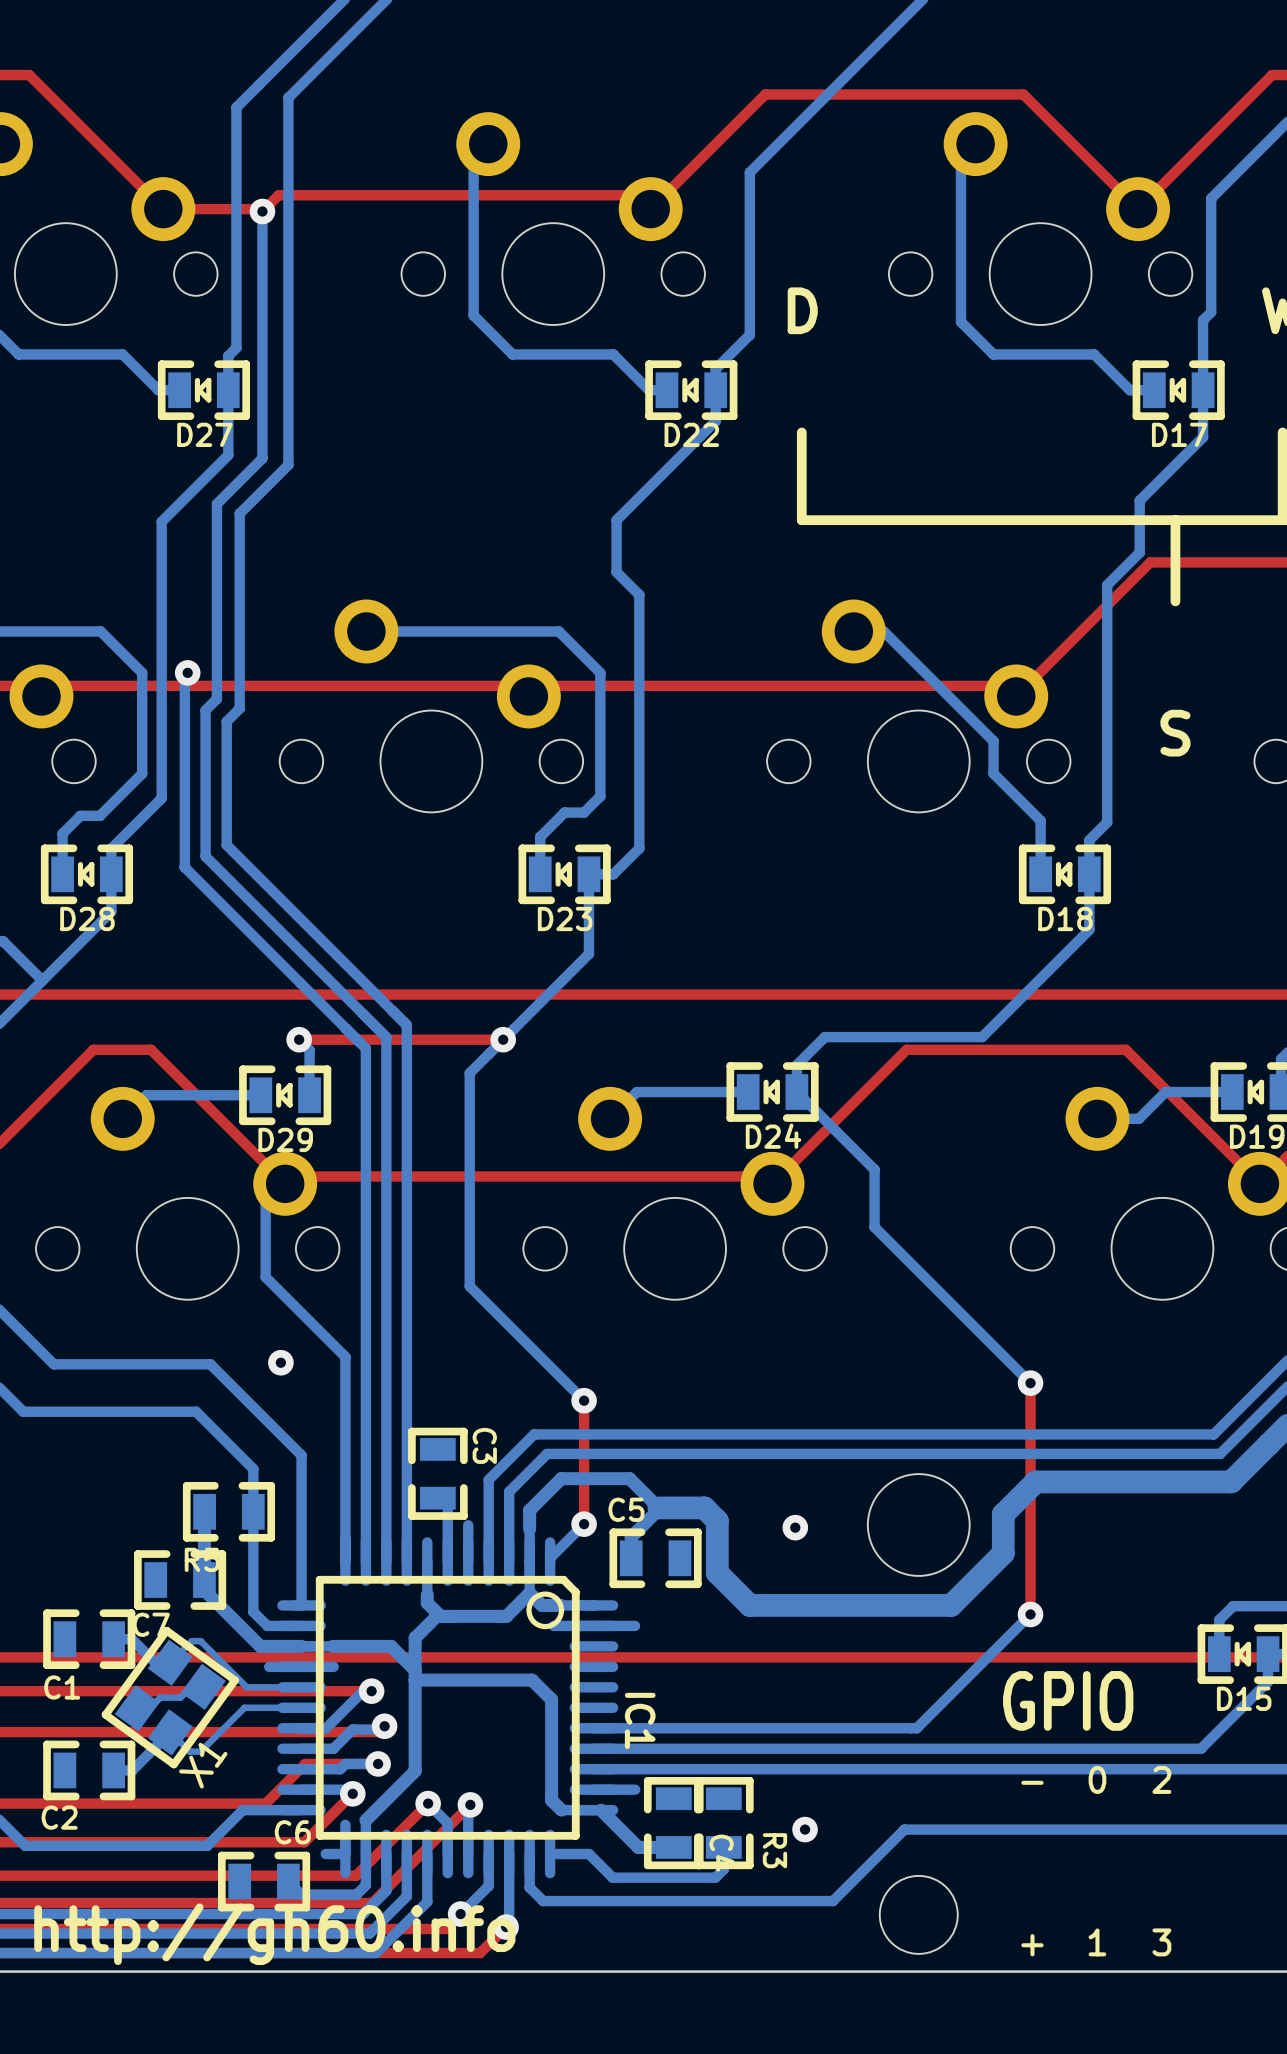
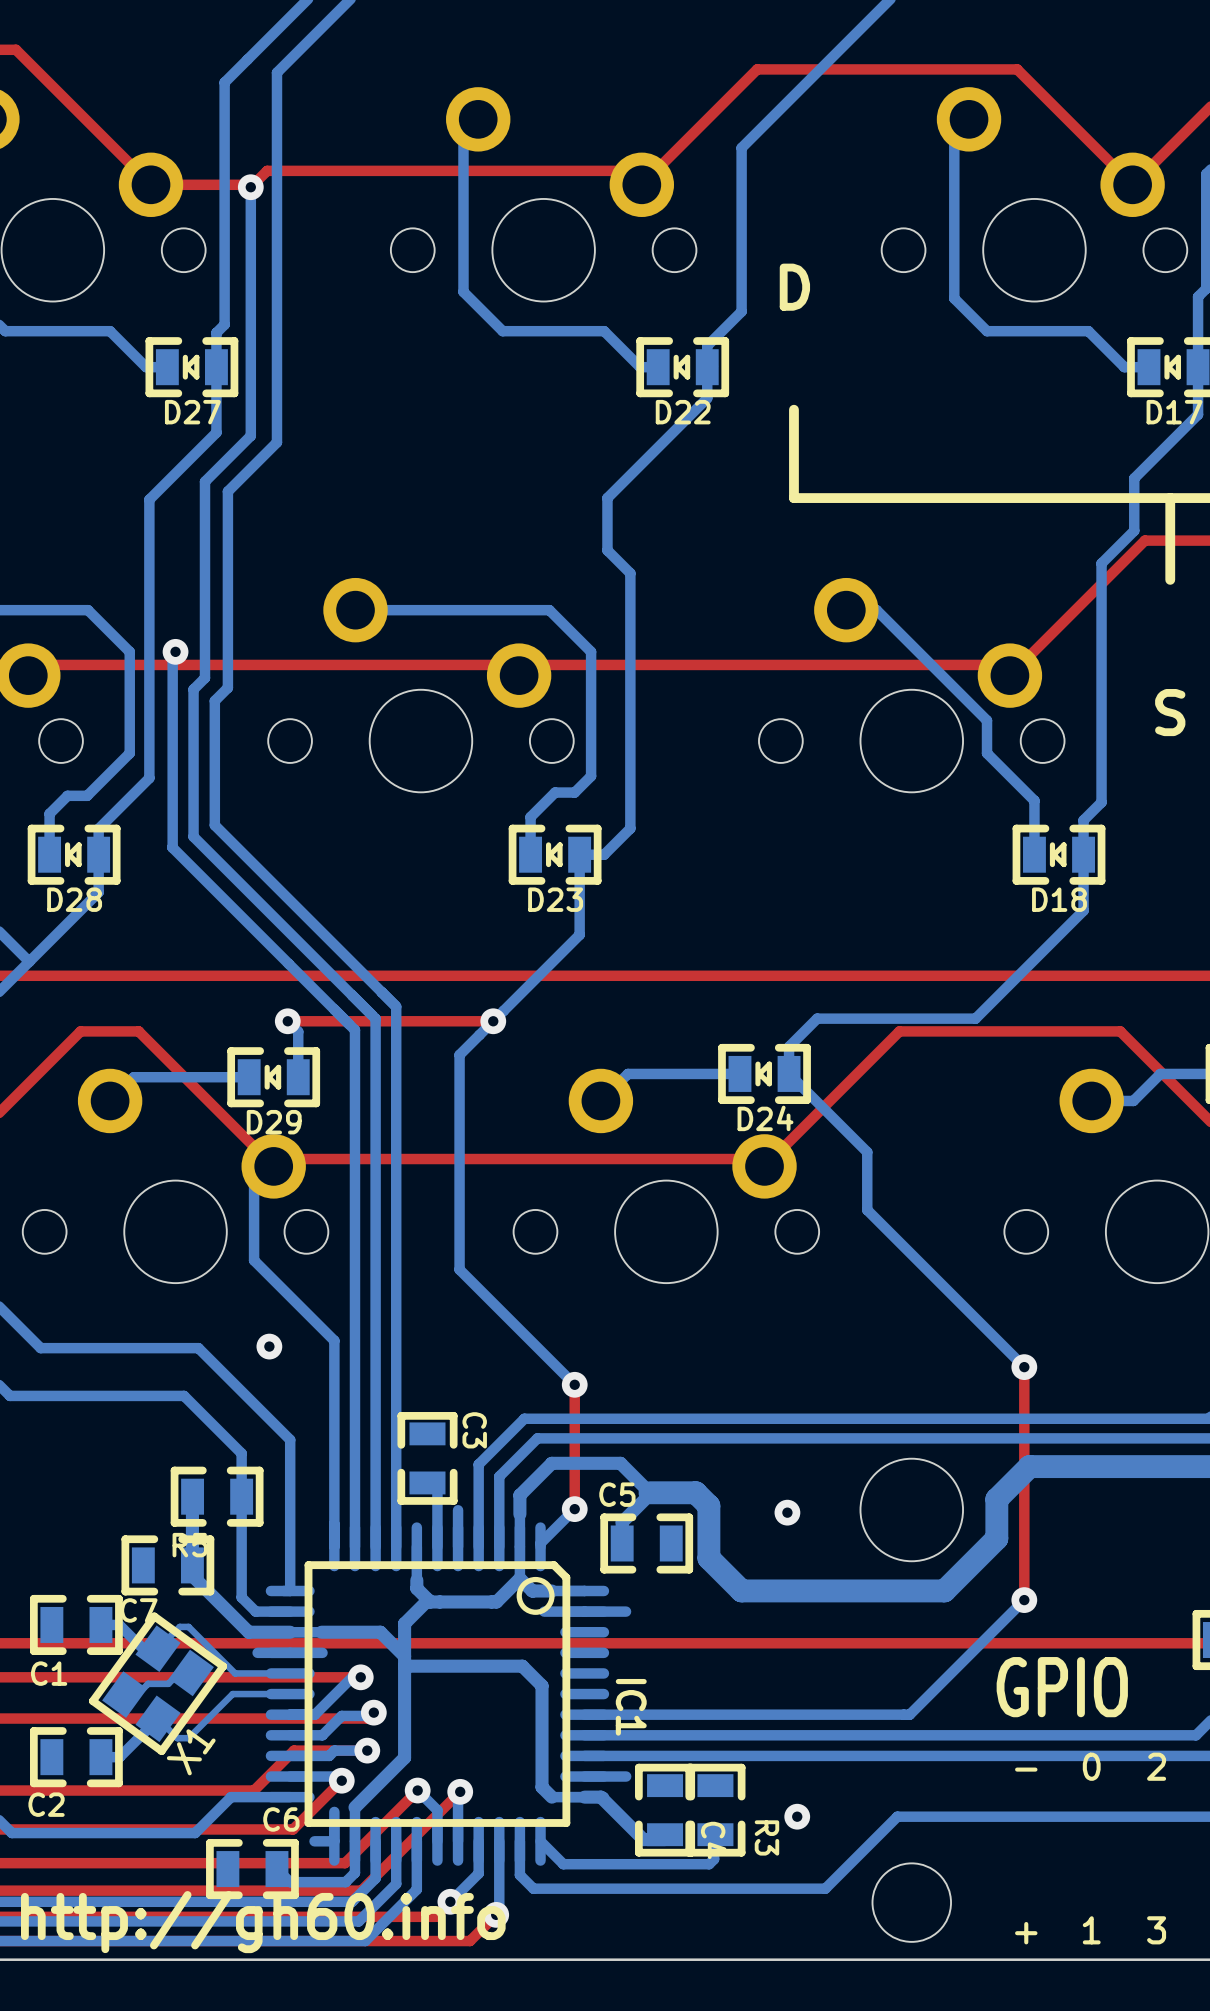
bottom track: none -> (584, 1797) (600, 1797) (643, 1839) (665, 1839)
bottom track: (601, 1810) (638, 1847) (673, 1847) -> none
bottom track: (723, 1847) (723, 1869) (715, 1877) (612, 1877) (589, 1854) (550, 1854) -> (714, 1842) (714, 1859) (709, 1864) (563, 1864) (540, 1841)

